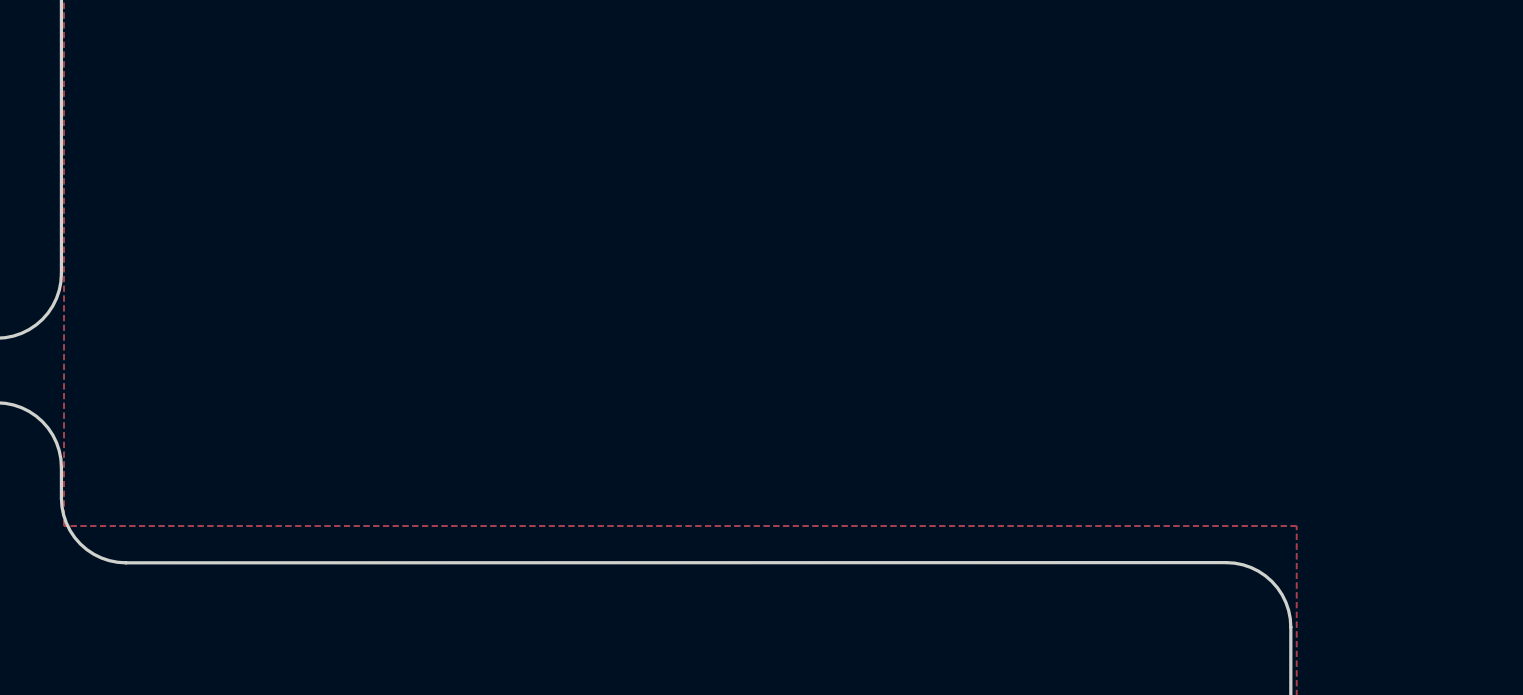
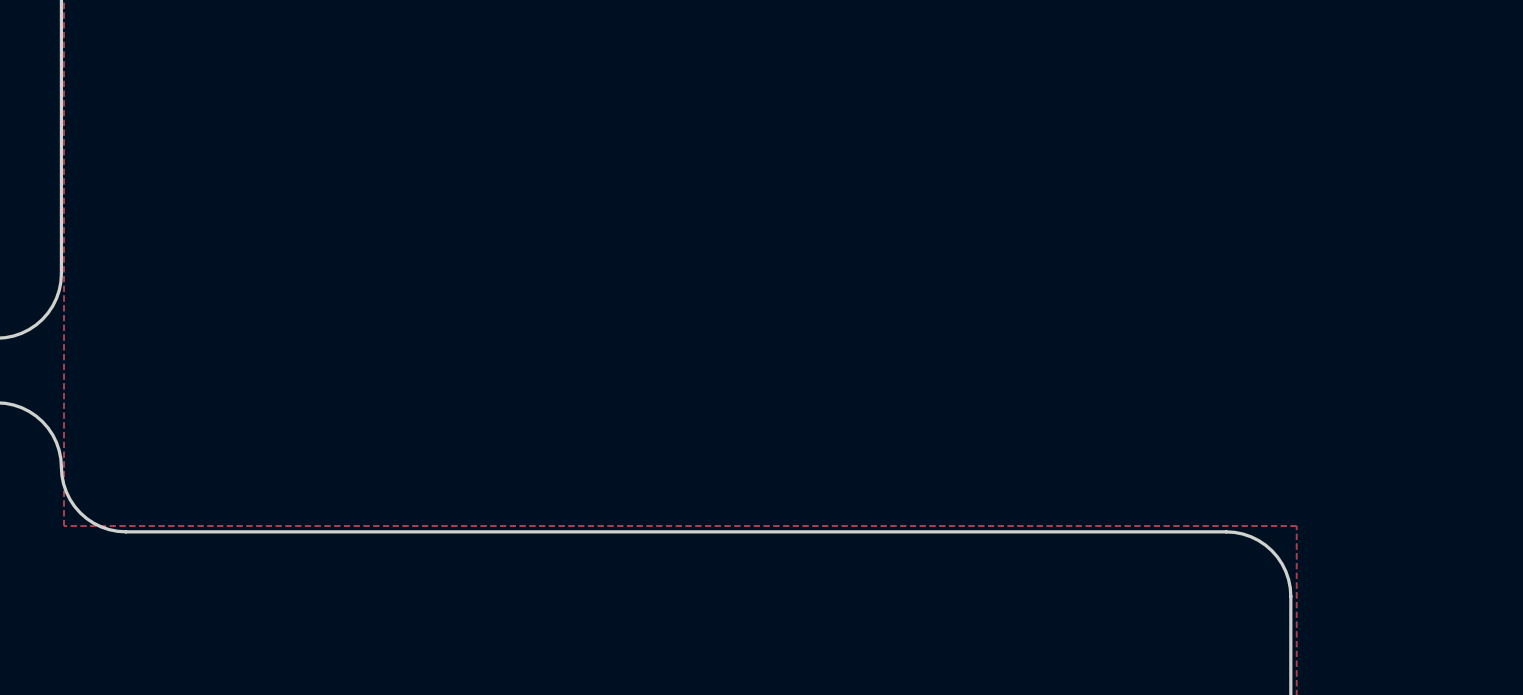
board edge: (61, 467) (61, 506) (70, 530) (80, 543) (93, 554) (117, 562) (1226, 562) (1250, 567) (1271, 581) (1285, 602) (1290, 627) -> (61, 467) (66, 492) (80, 512) (101, 526) (125, 531) (1234, 532) (1258, 540) (1271, 550) (1282, 564) (1290, 587) (1290, 627)

